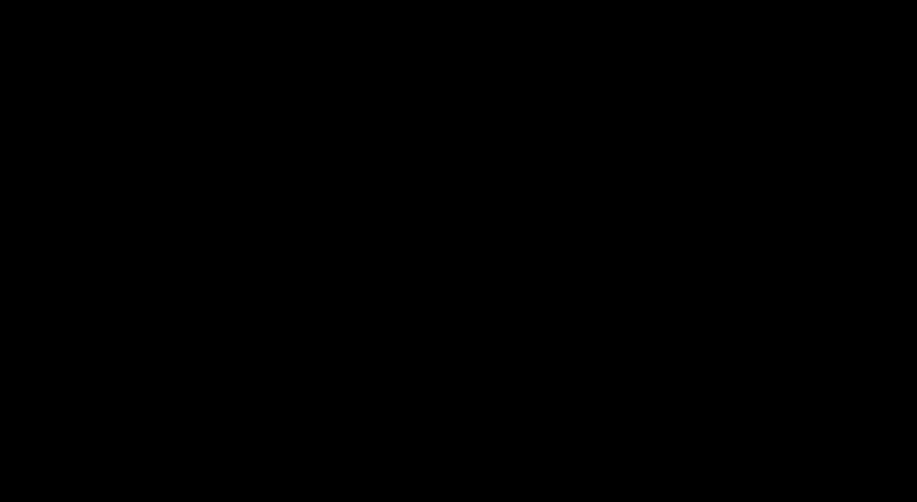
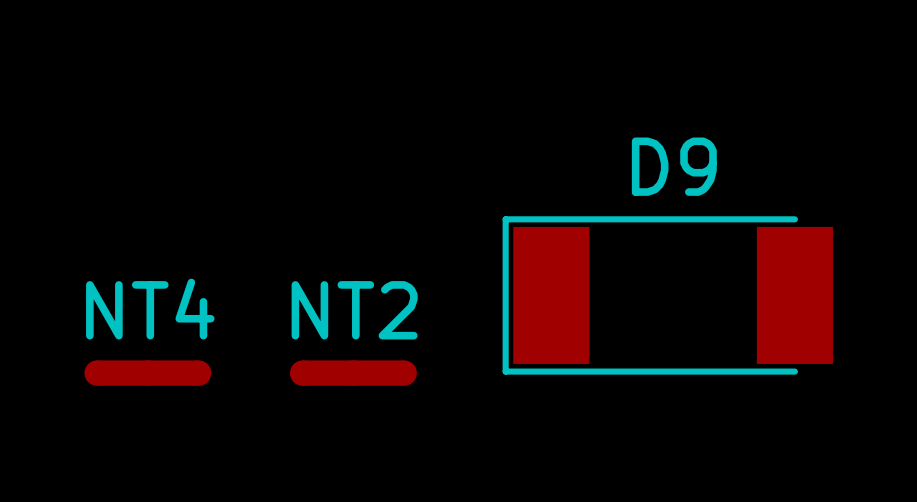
D9: none -> (667, 295)
NT4: none -> (147, 373)
NT2: none -> (353, 373)

